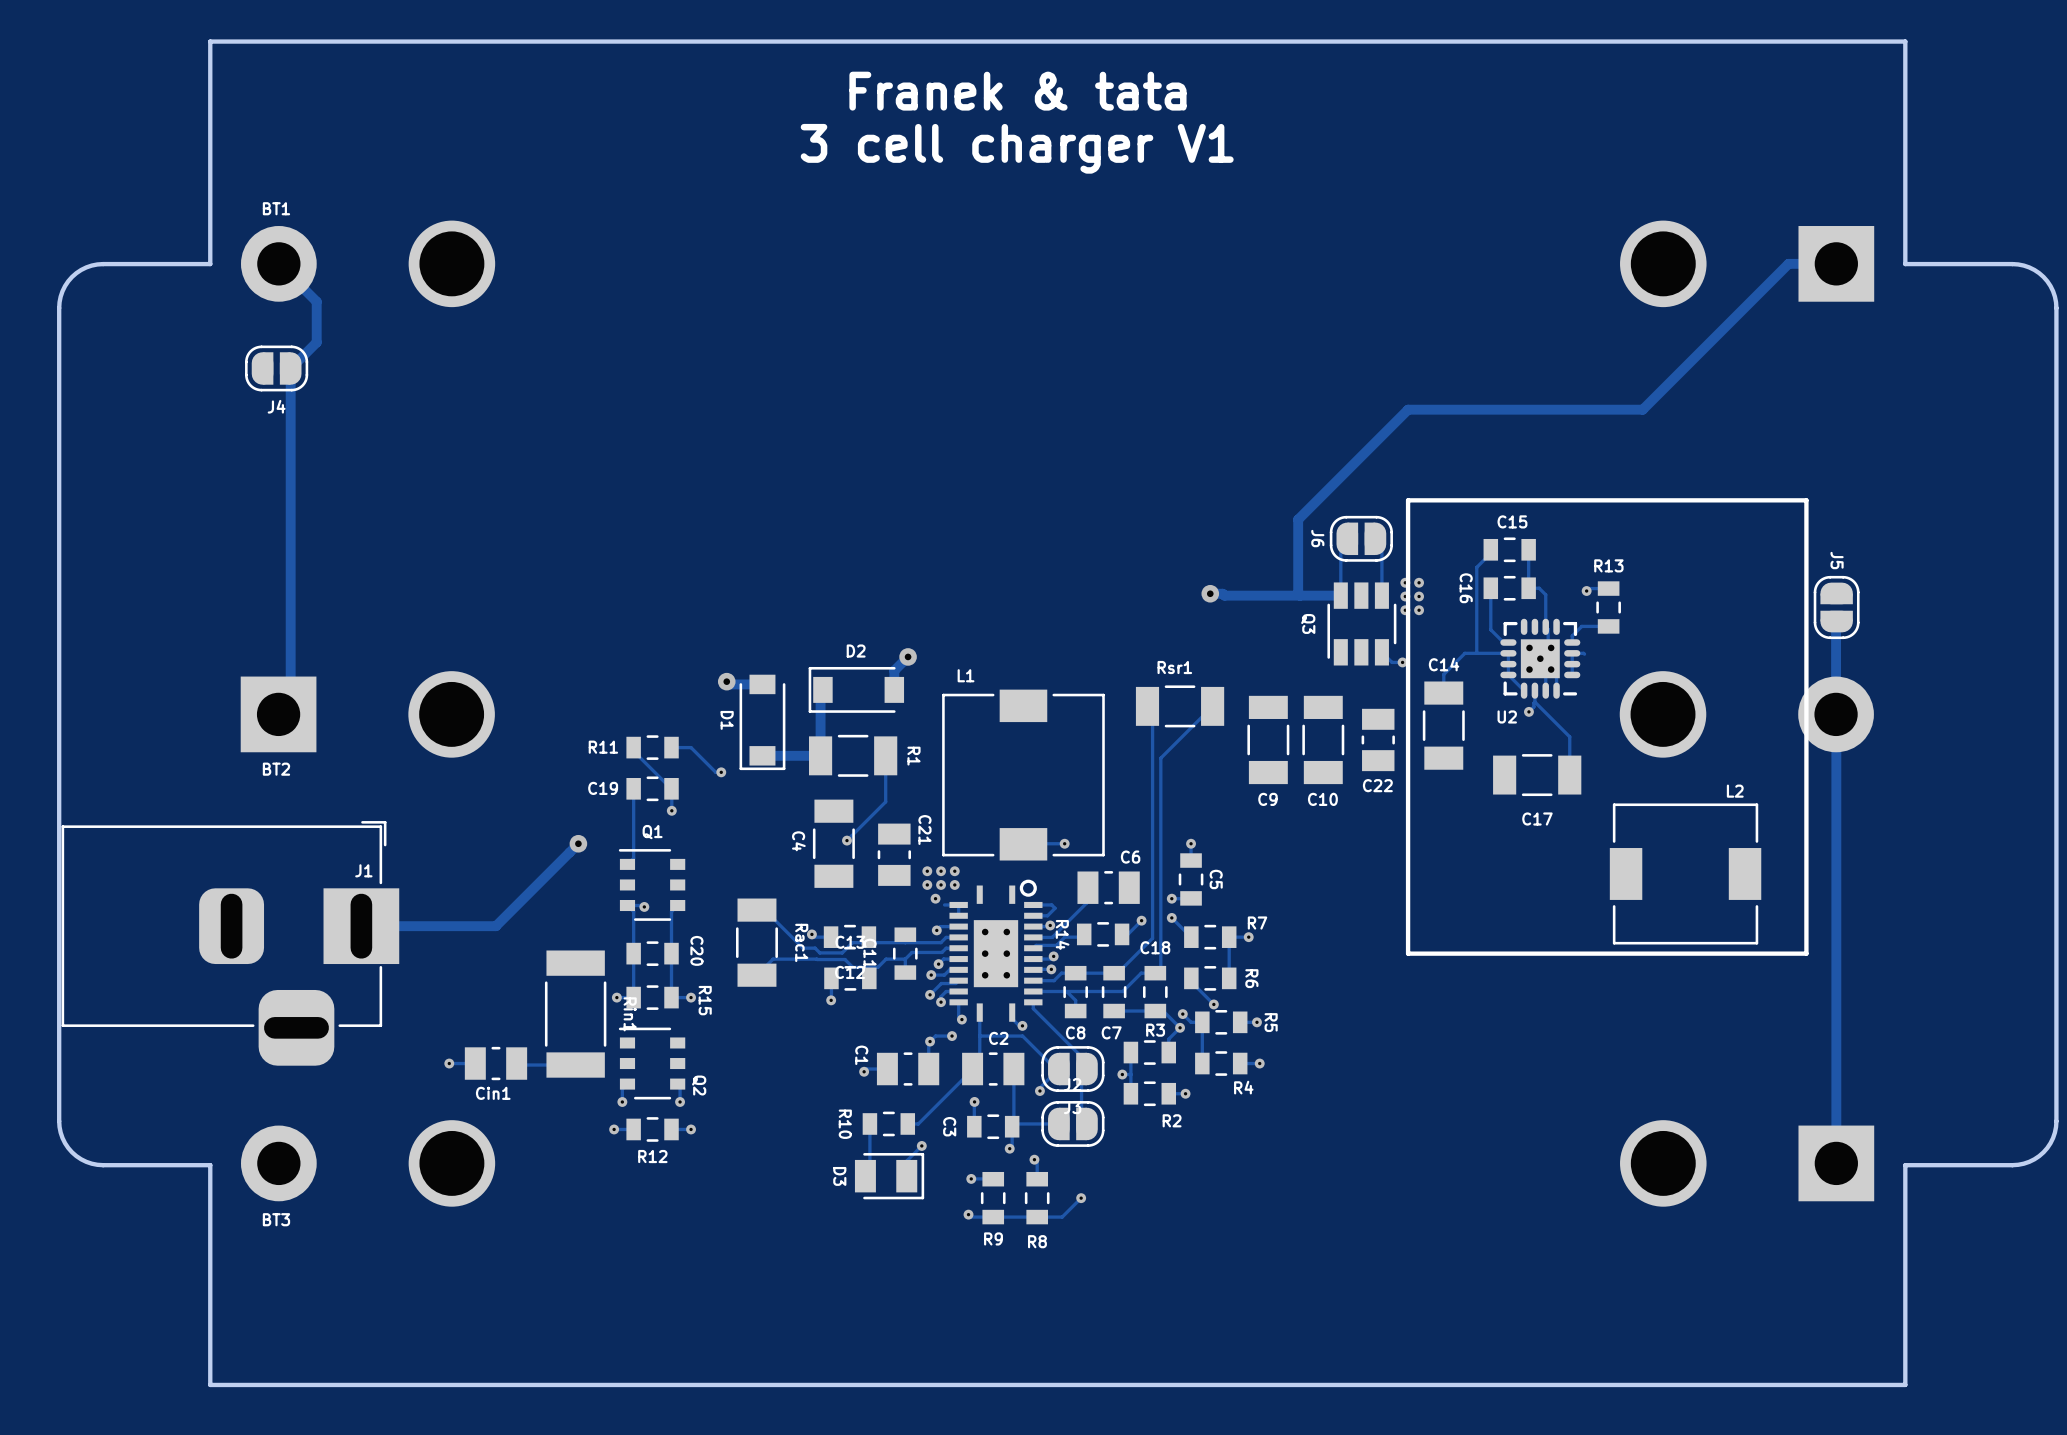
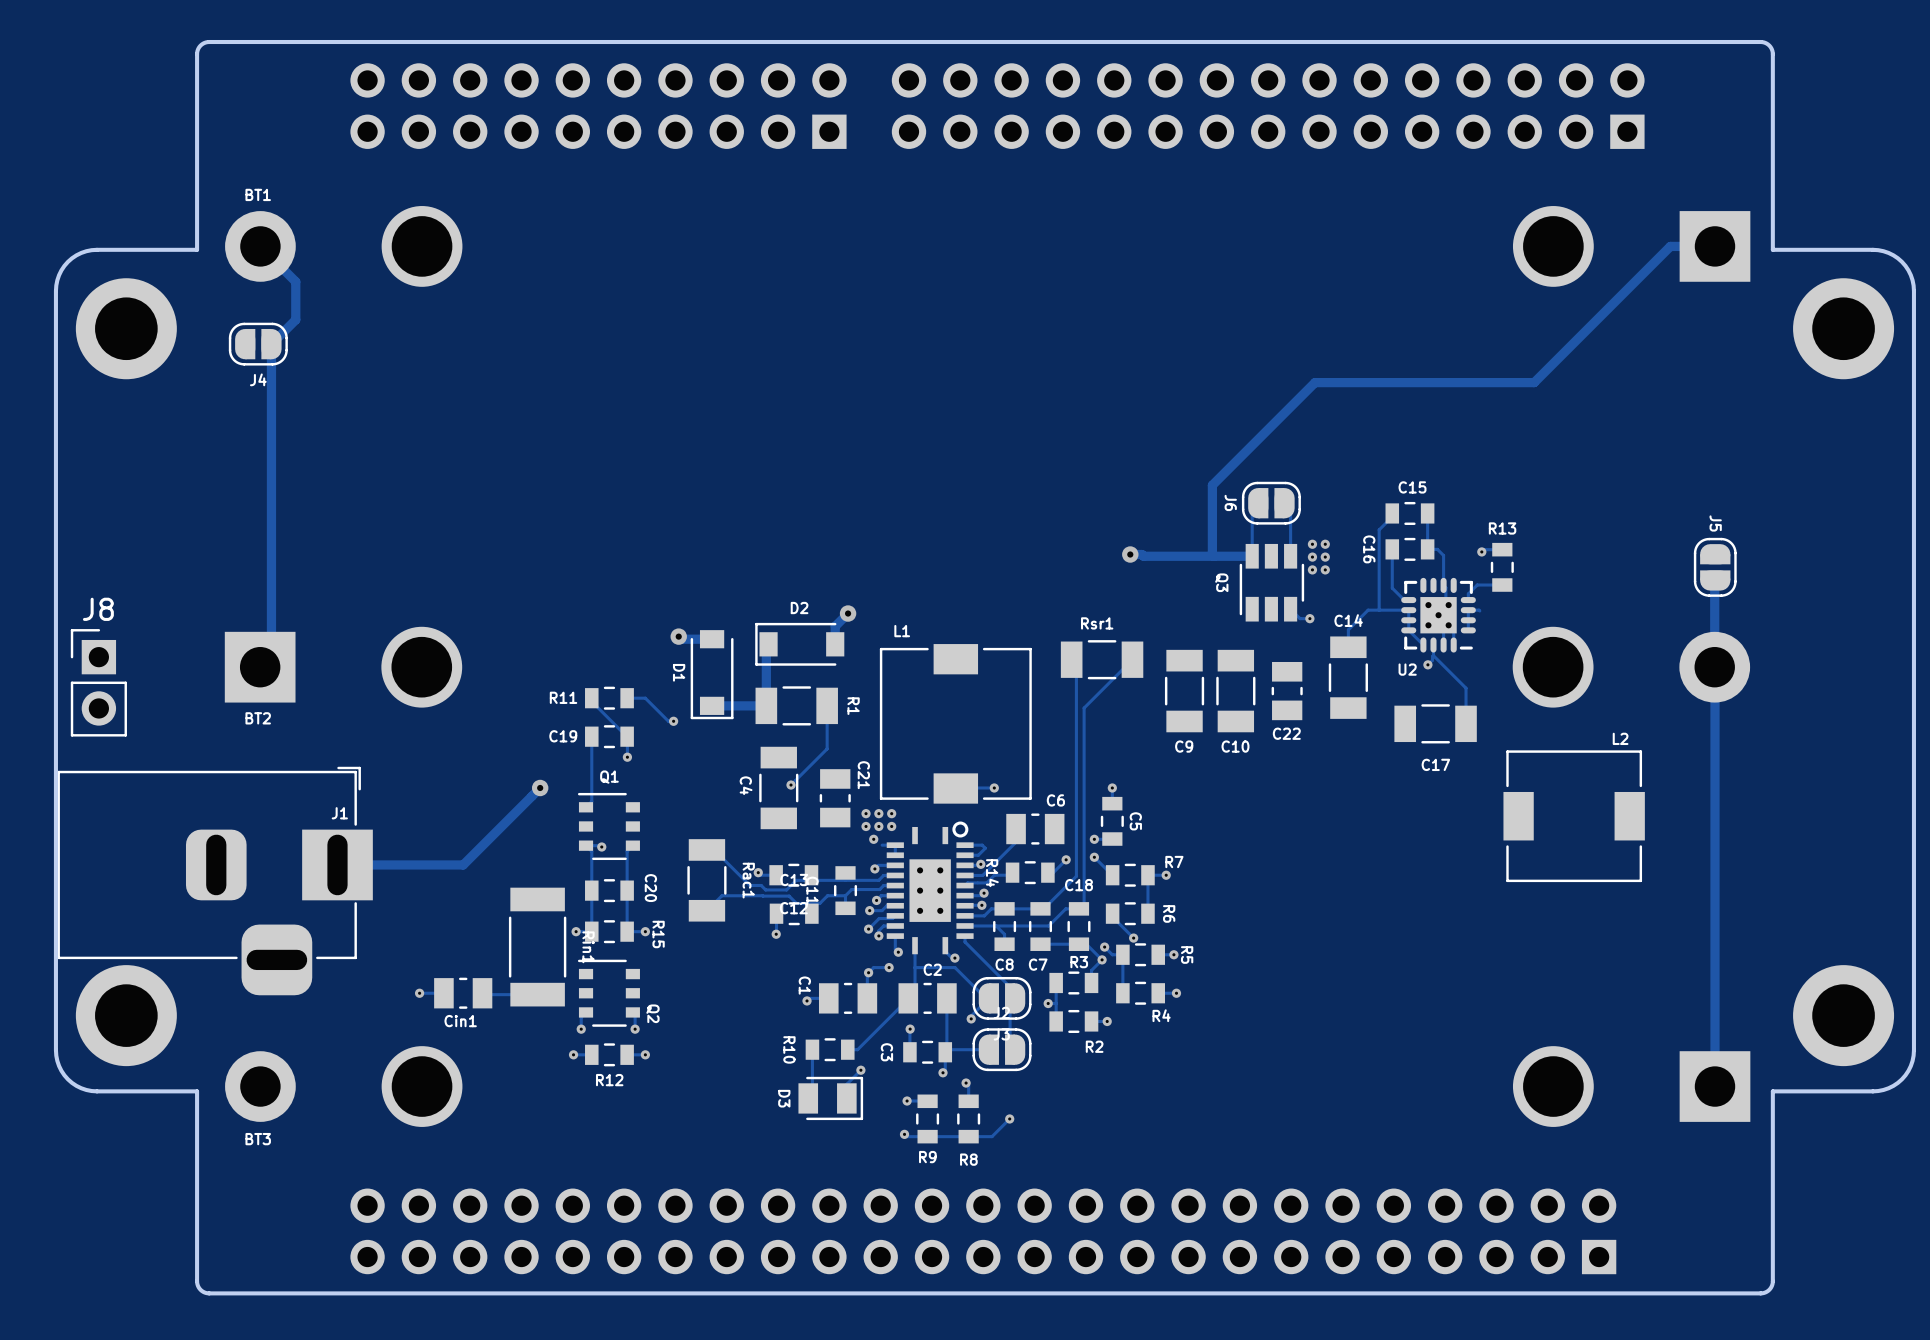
board edge: (1905, 41) (1905, 264) (2023, 265) (2034, 269) (2047, 281) (2054, 296) (2056, 308) (2056, 1126) (2047, 1147) (2034, 1159) (2023, 1163) (1905, 1165) (1905, 1384) (210, 1384) (210, 1165) (91, 1163) (76, 1156) (68, 1147) (59, 1126) (59, 308) (62, 291) (68, 281) (81, 269) (91, 265) (210, 264) (210, 41) (1905, 41) -> none
text: Franek & tata (1017, 91) -> none
text: 3 cell charger V1 (1017, 148) -> none
line: (1806, 500) (1806, 953) (1408, 953) (1408, 500) (1806, 500) -> none
part: none -> (984, 667)
J8: none -> (98, 682)

